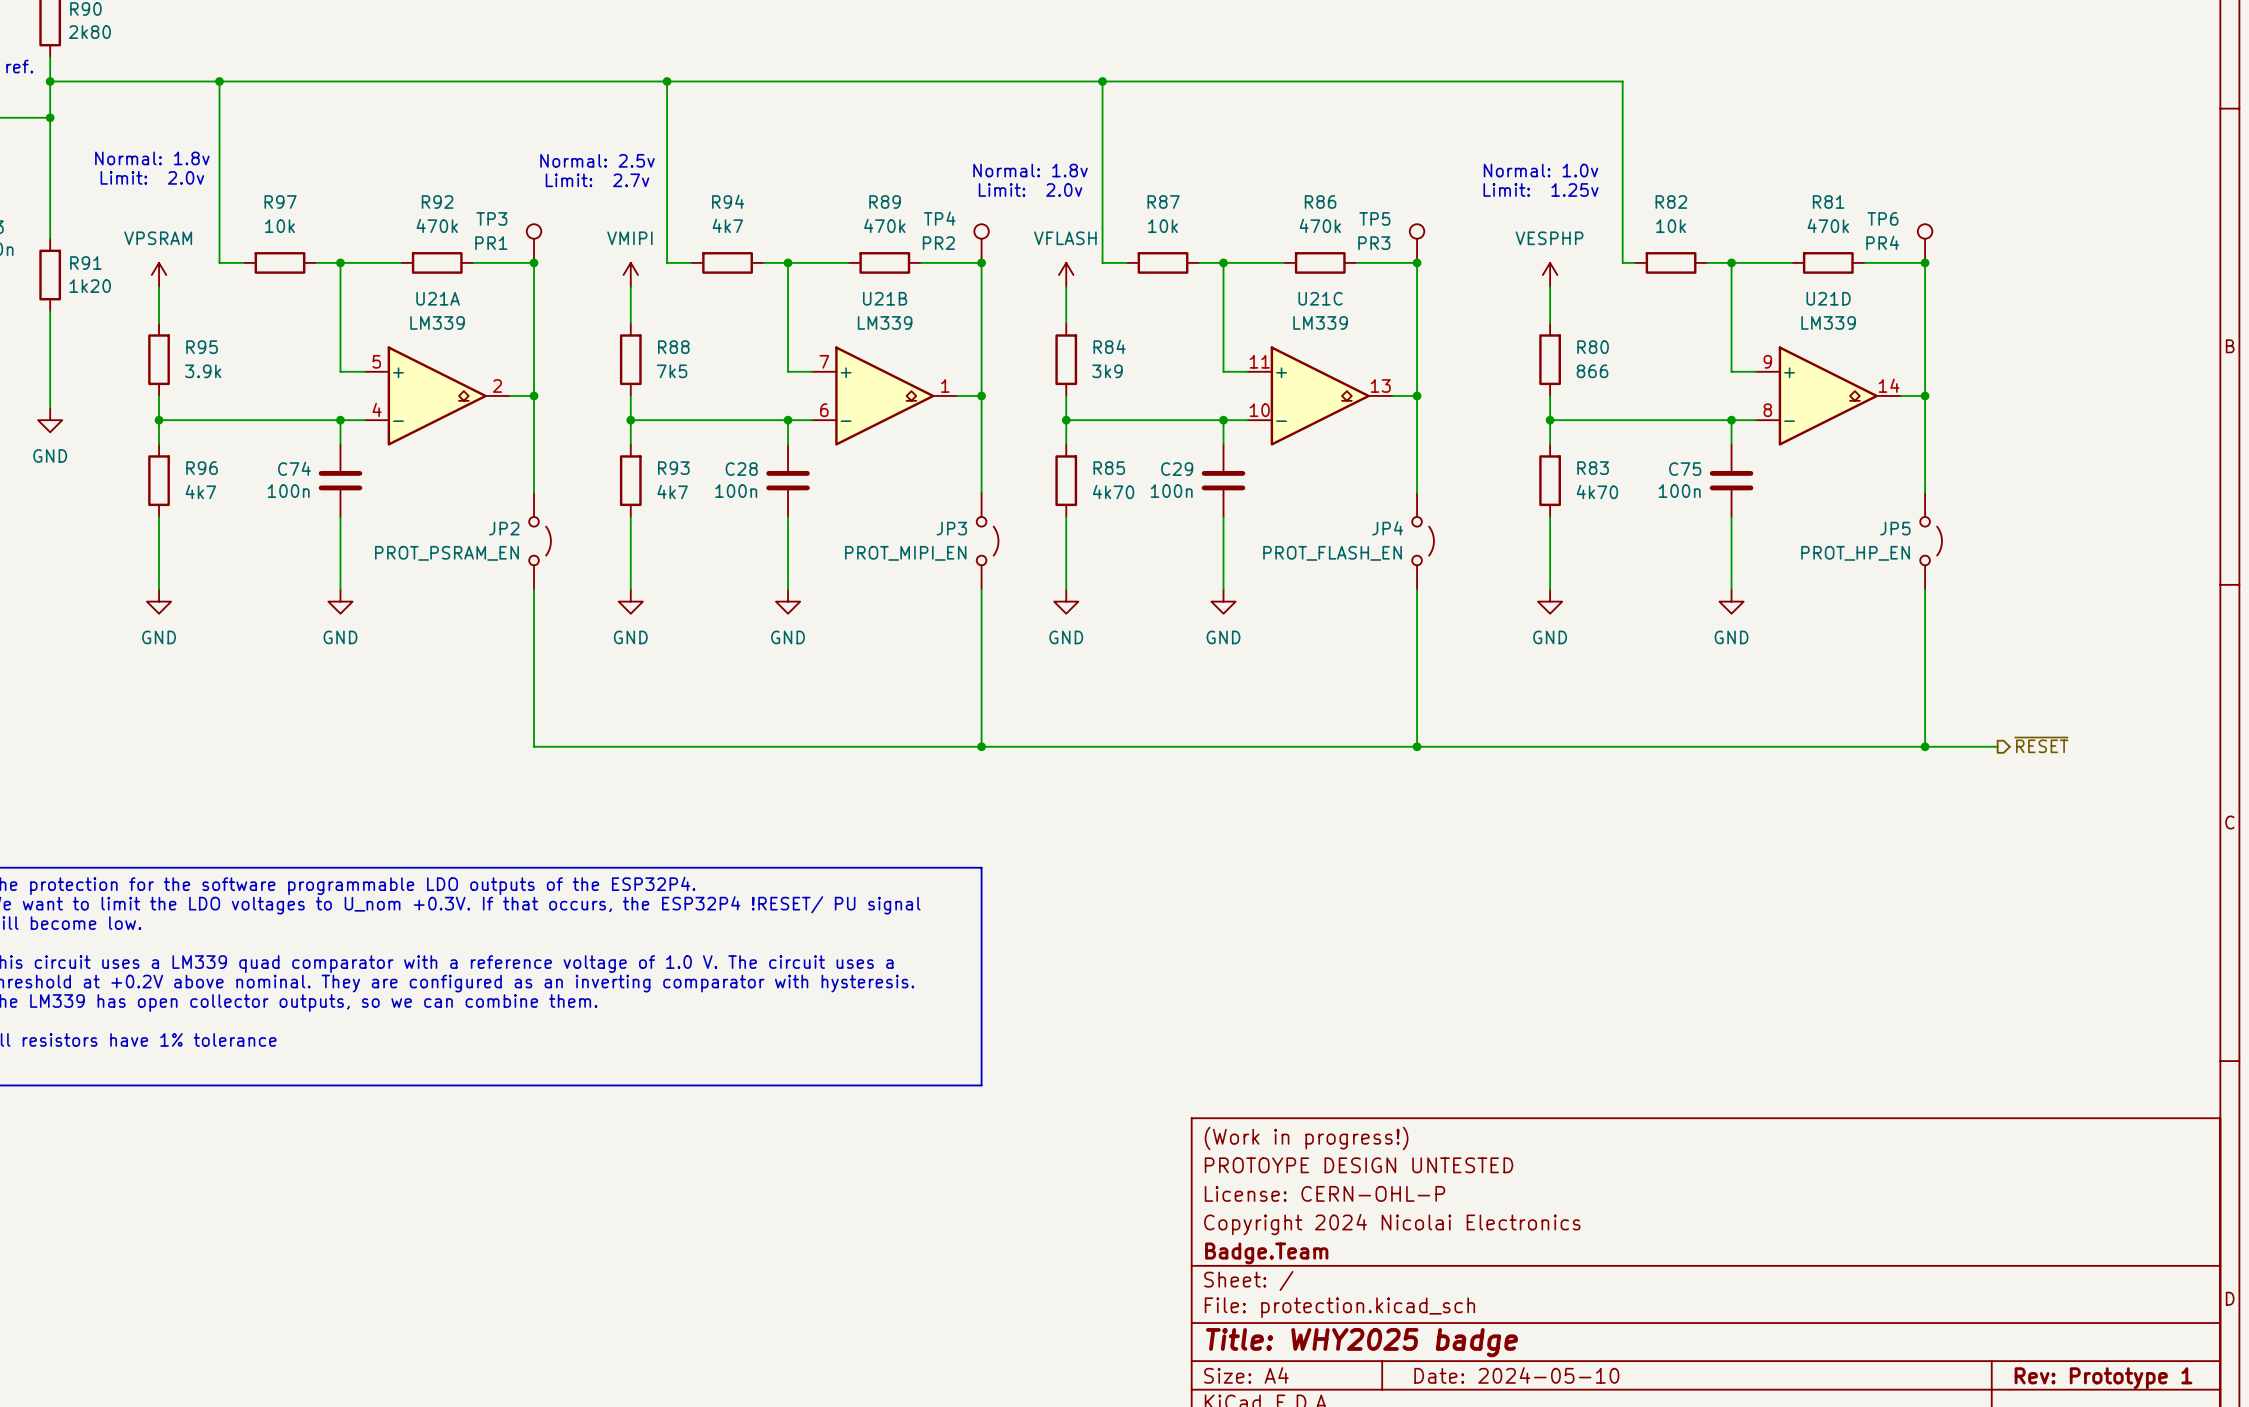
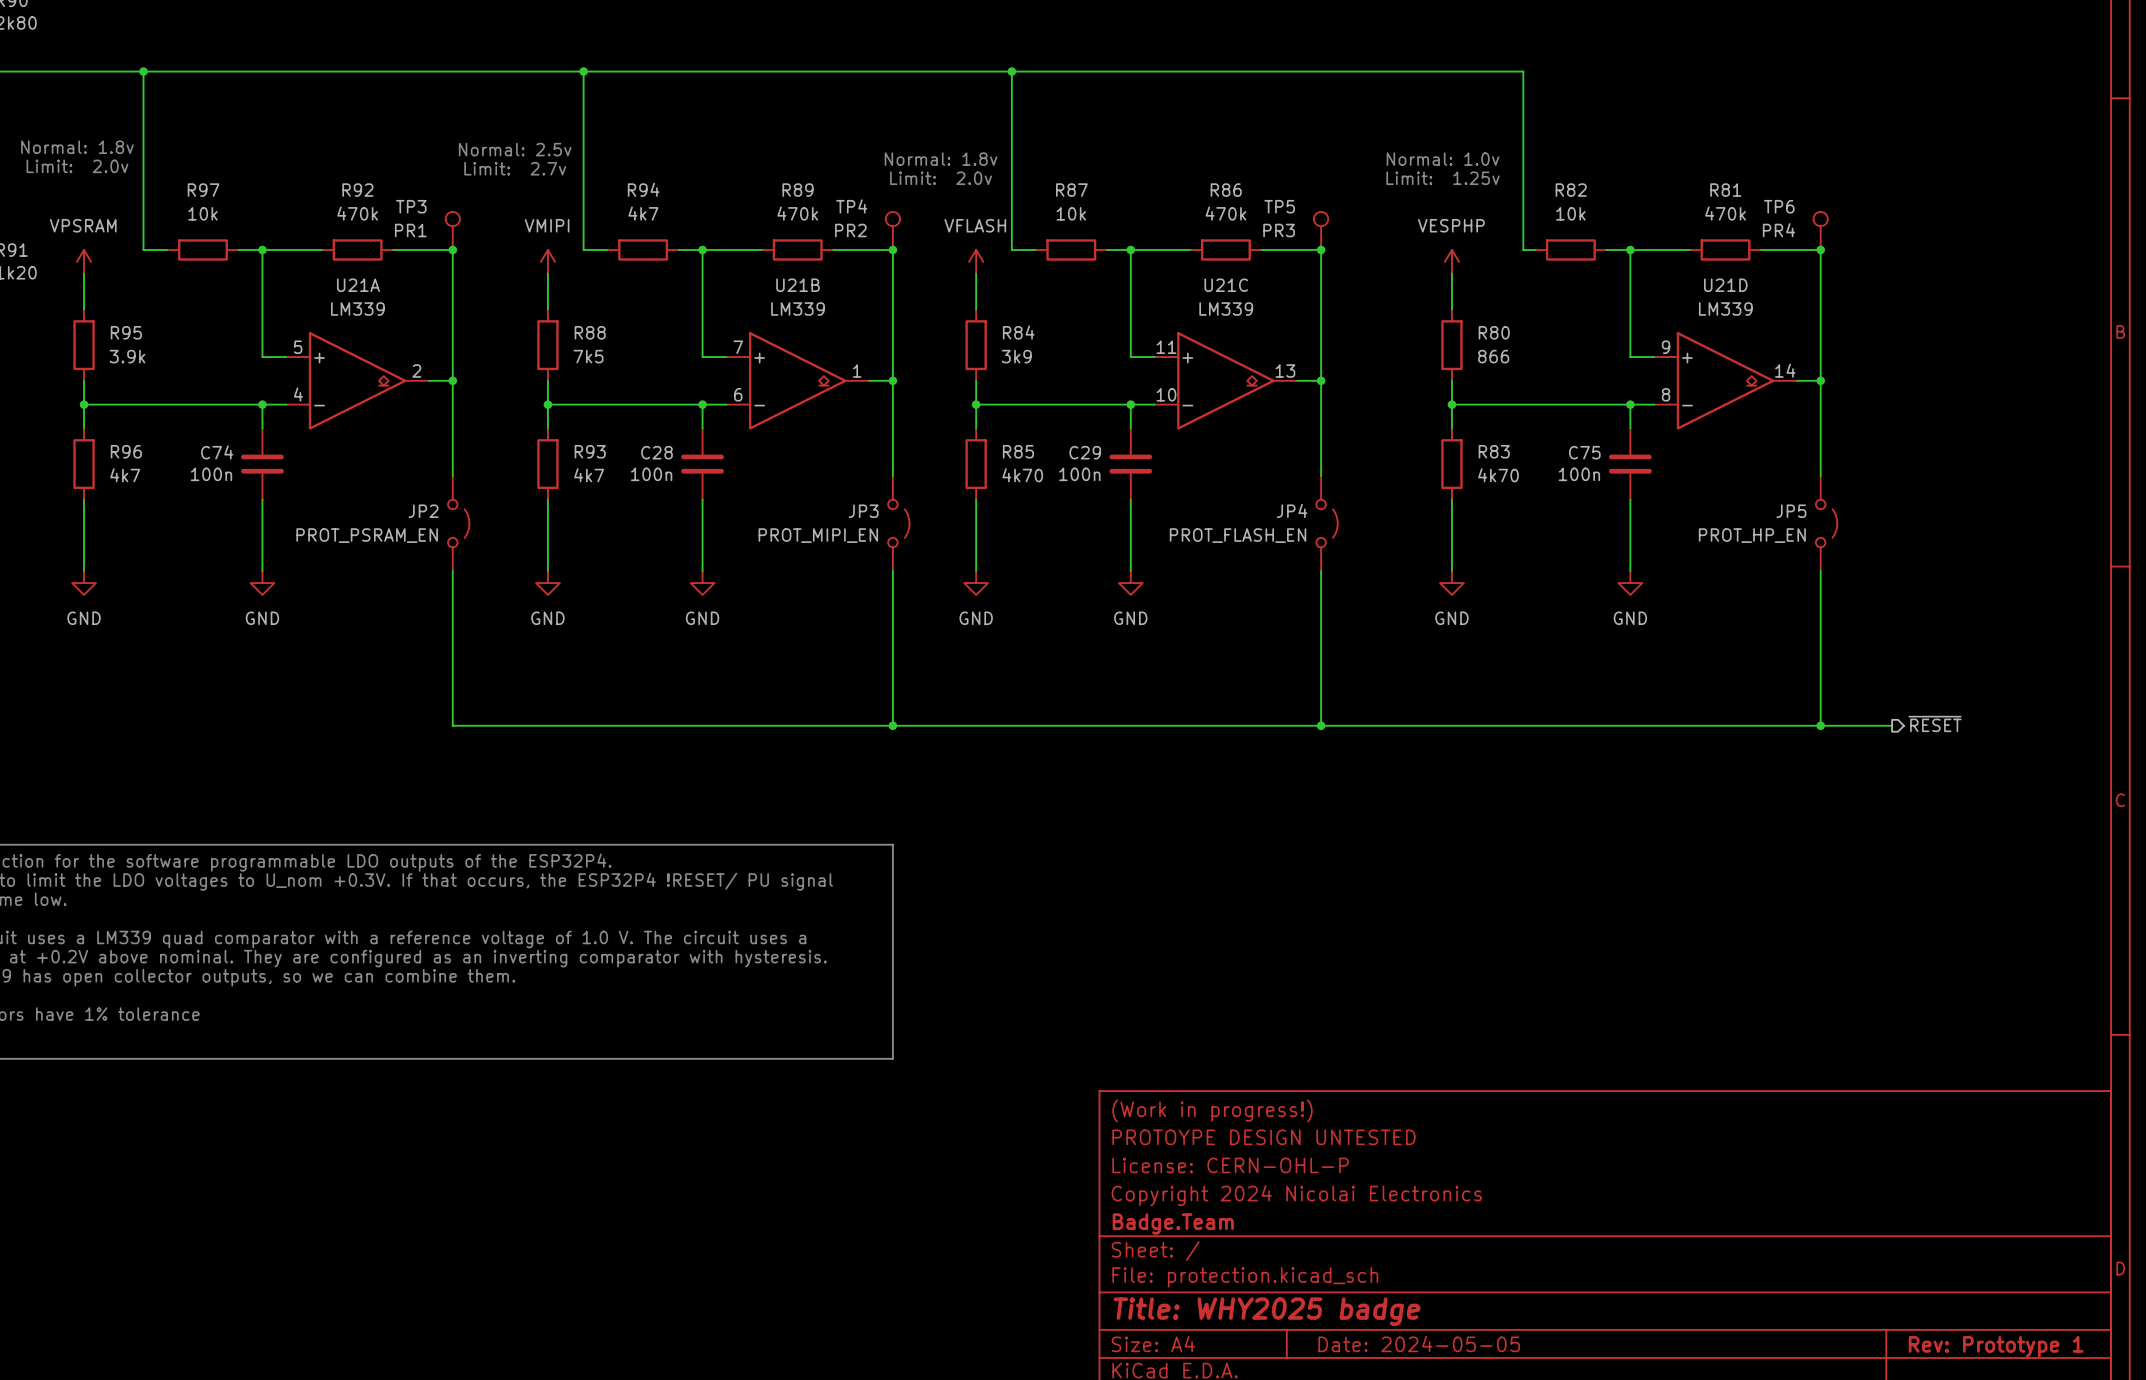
title block: Date: 2024-05-10 (1516, 1375) -> Date: 2024-05-05 (1419, 1344)

